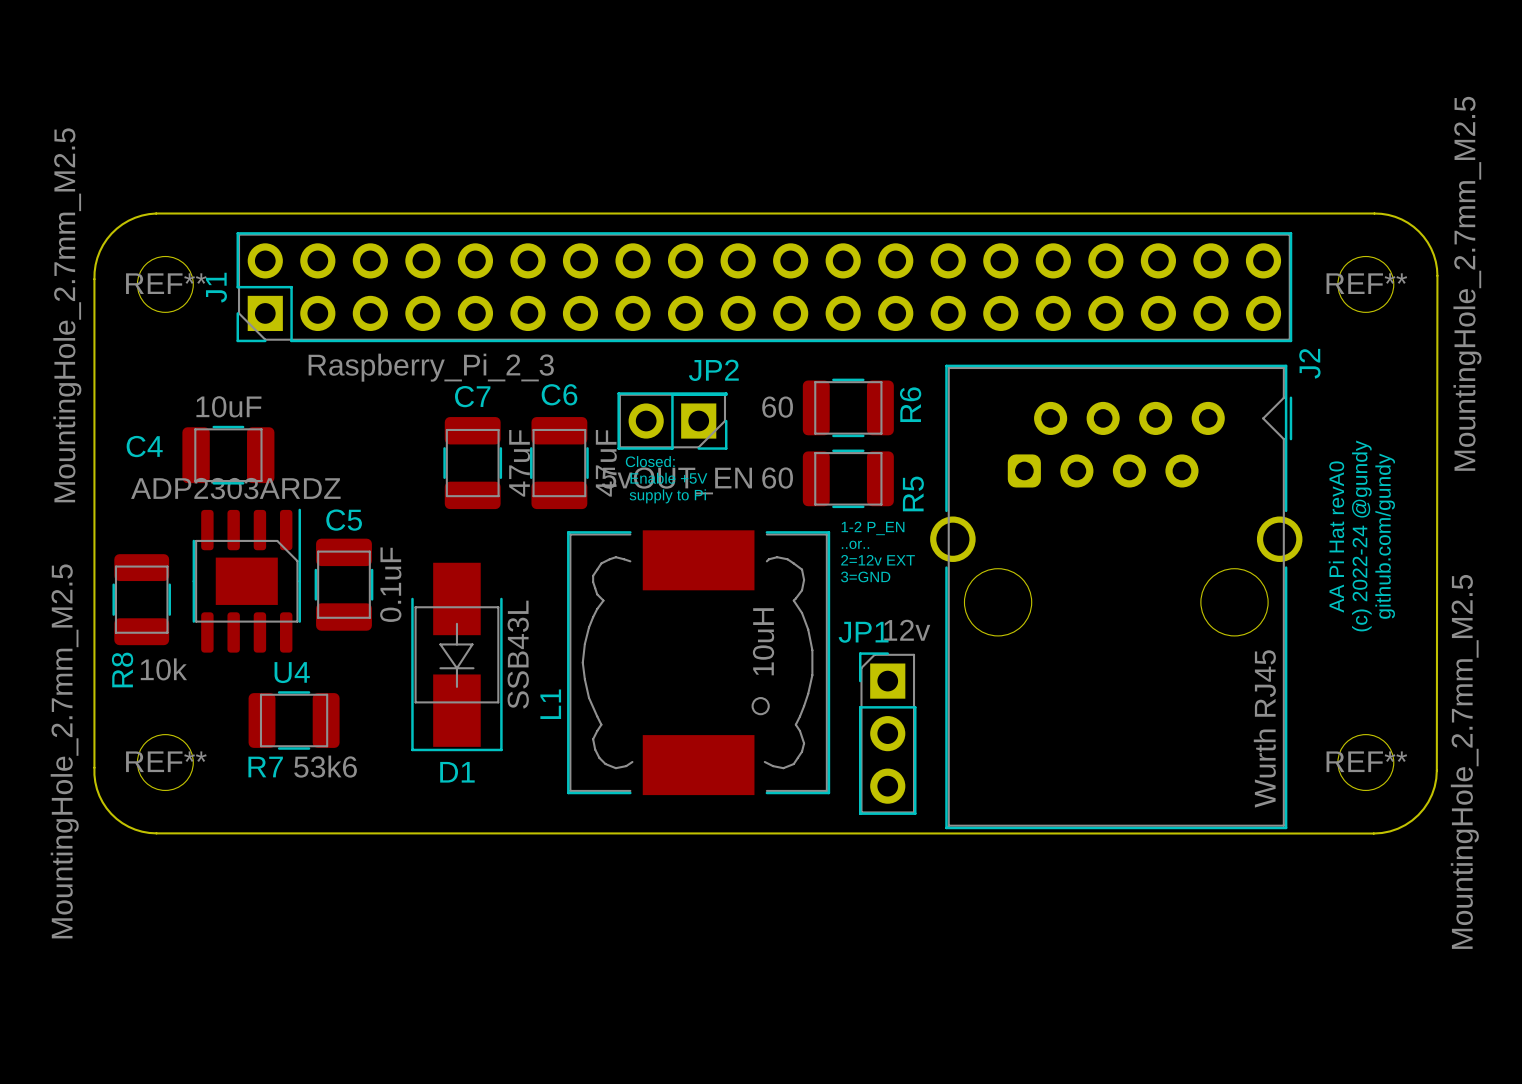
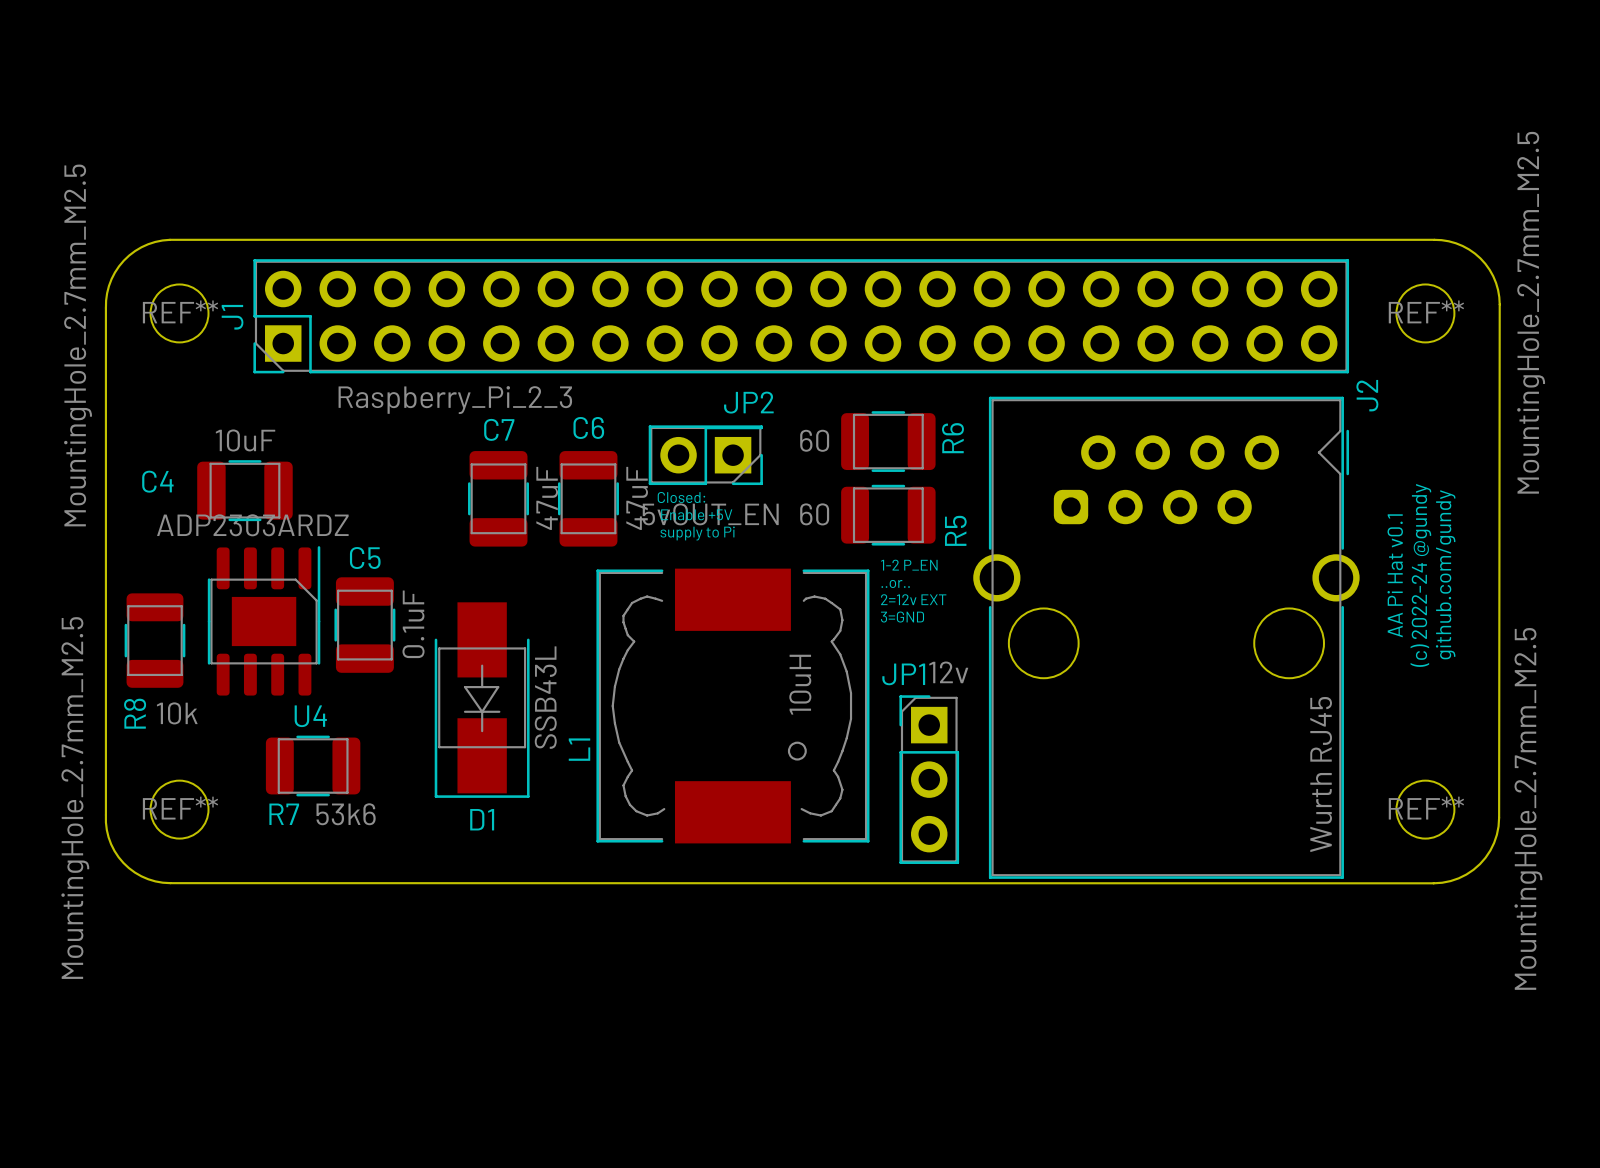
text: AA Pi Hat revA0 (1336, 537) -> AA Pi Hat v0.1 (1395, 575)

